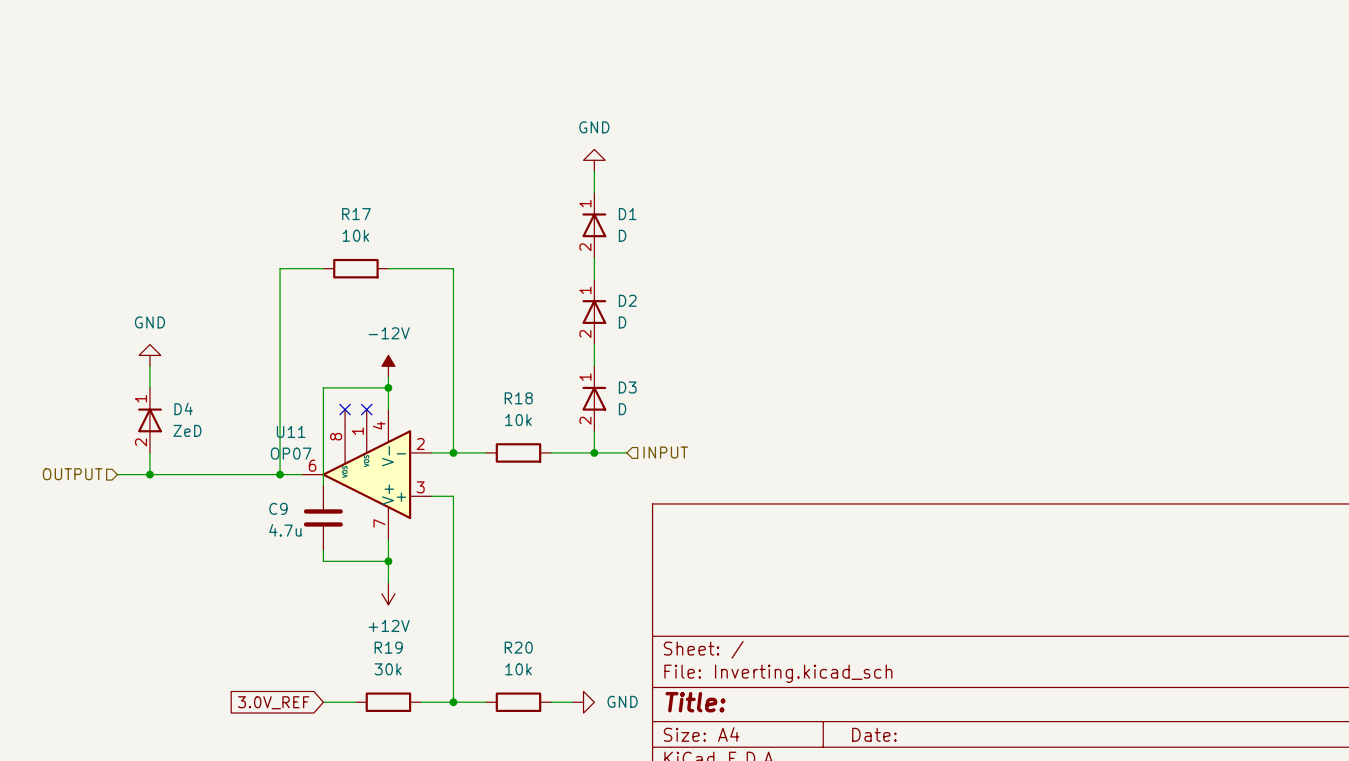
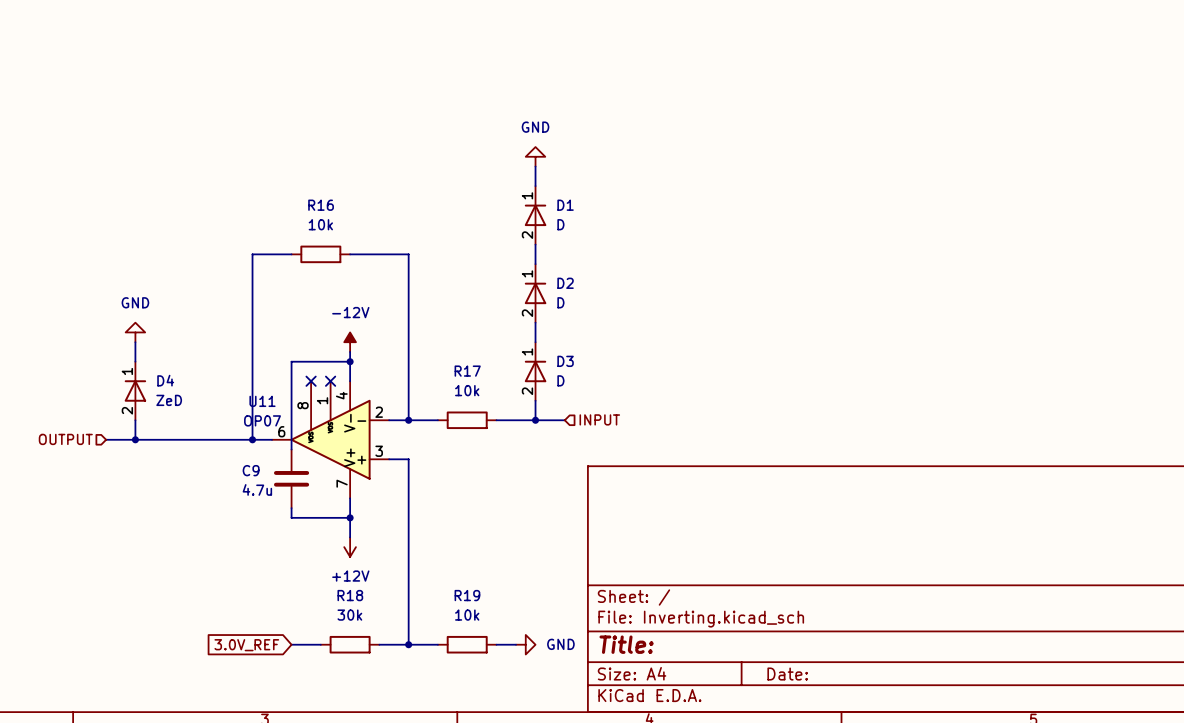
R17 name: R17 (356, 214) -> R16 (321, 205)
R18 name: R18 (518, 398) -> R17 (467, 371)
R19 name: R19 (388, 647) -> R18 (350, 595)
R20 name: R20 (518, 647) -> R19 (467, 595)

